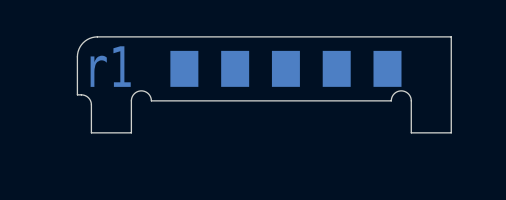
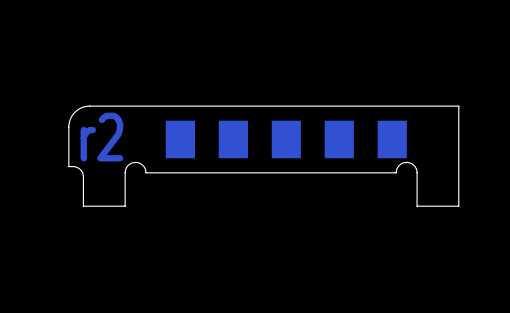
text: r1 (110, 66) -> r2 (101, 137)

